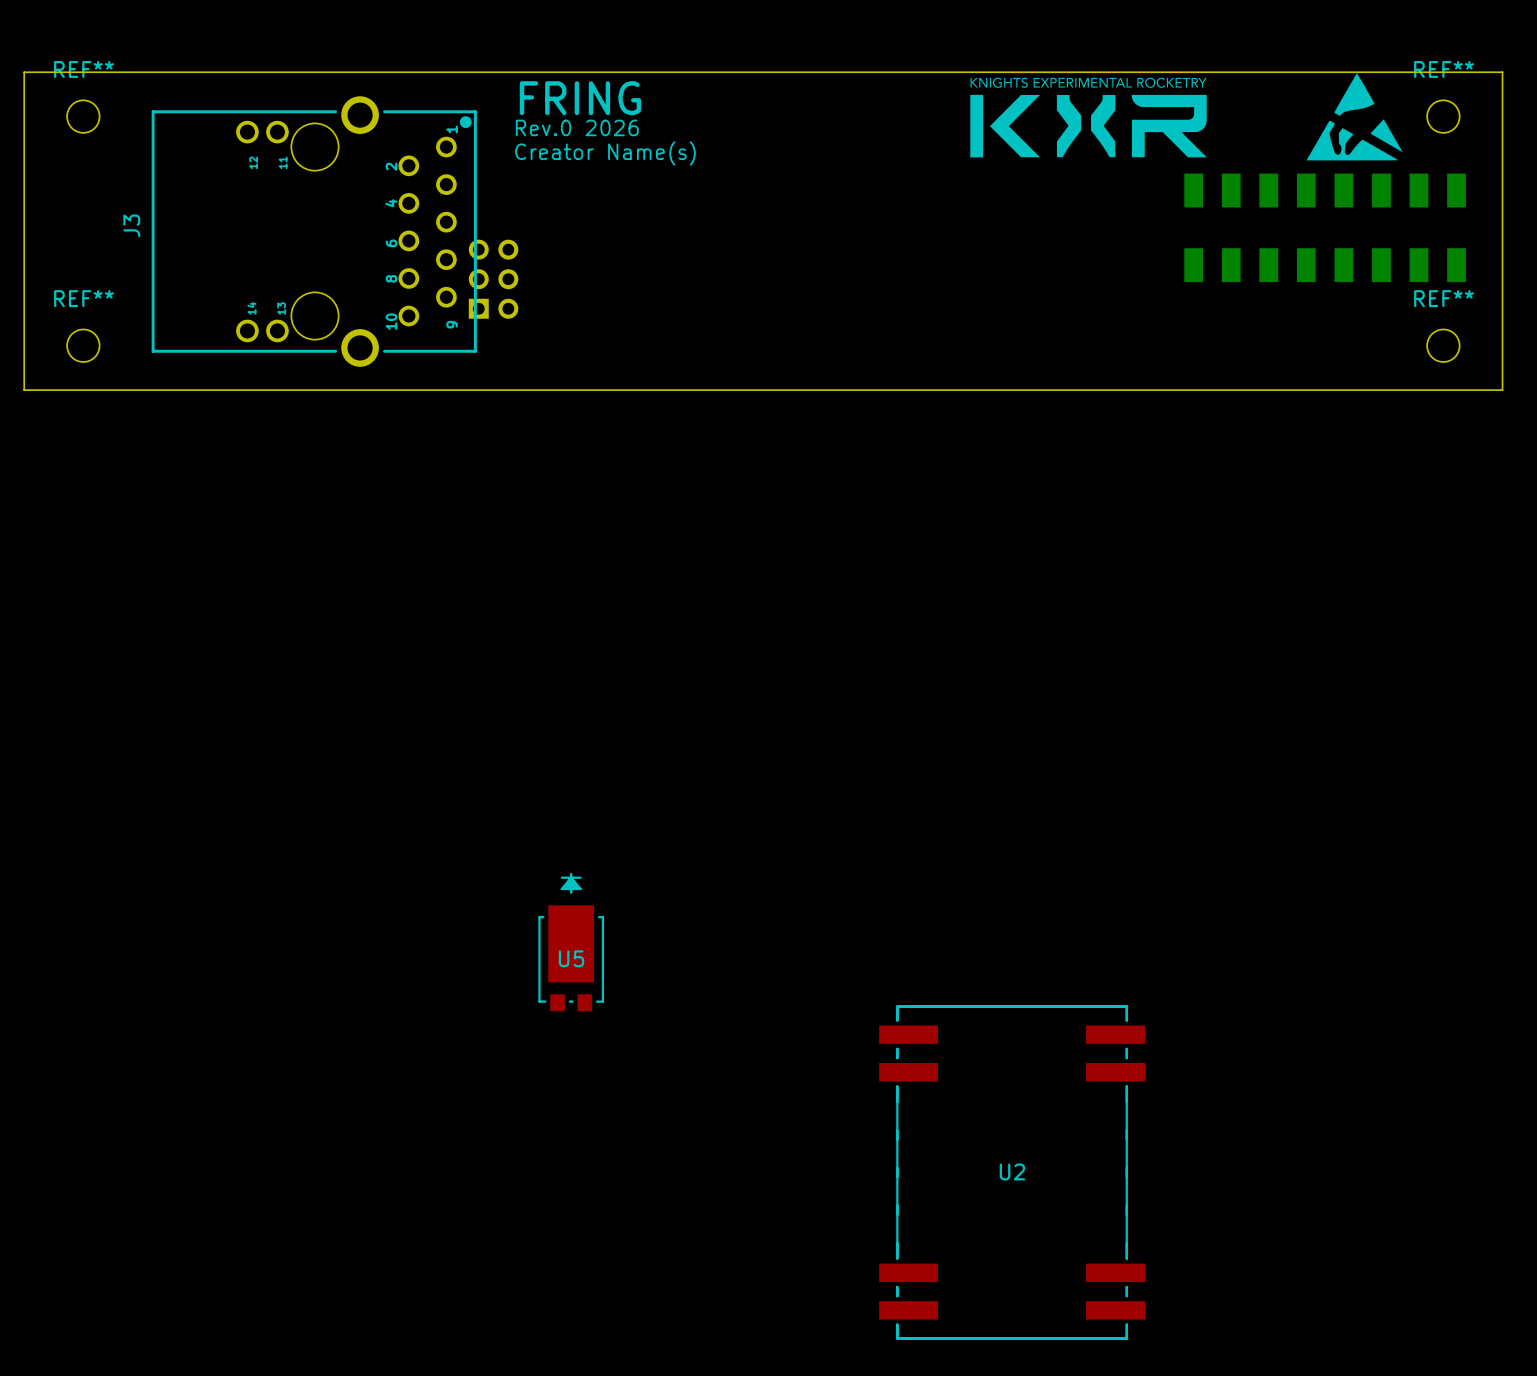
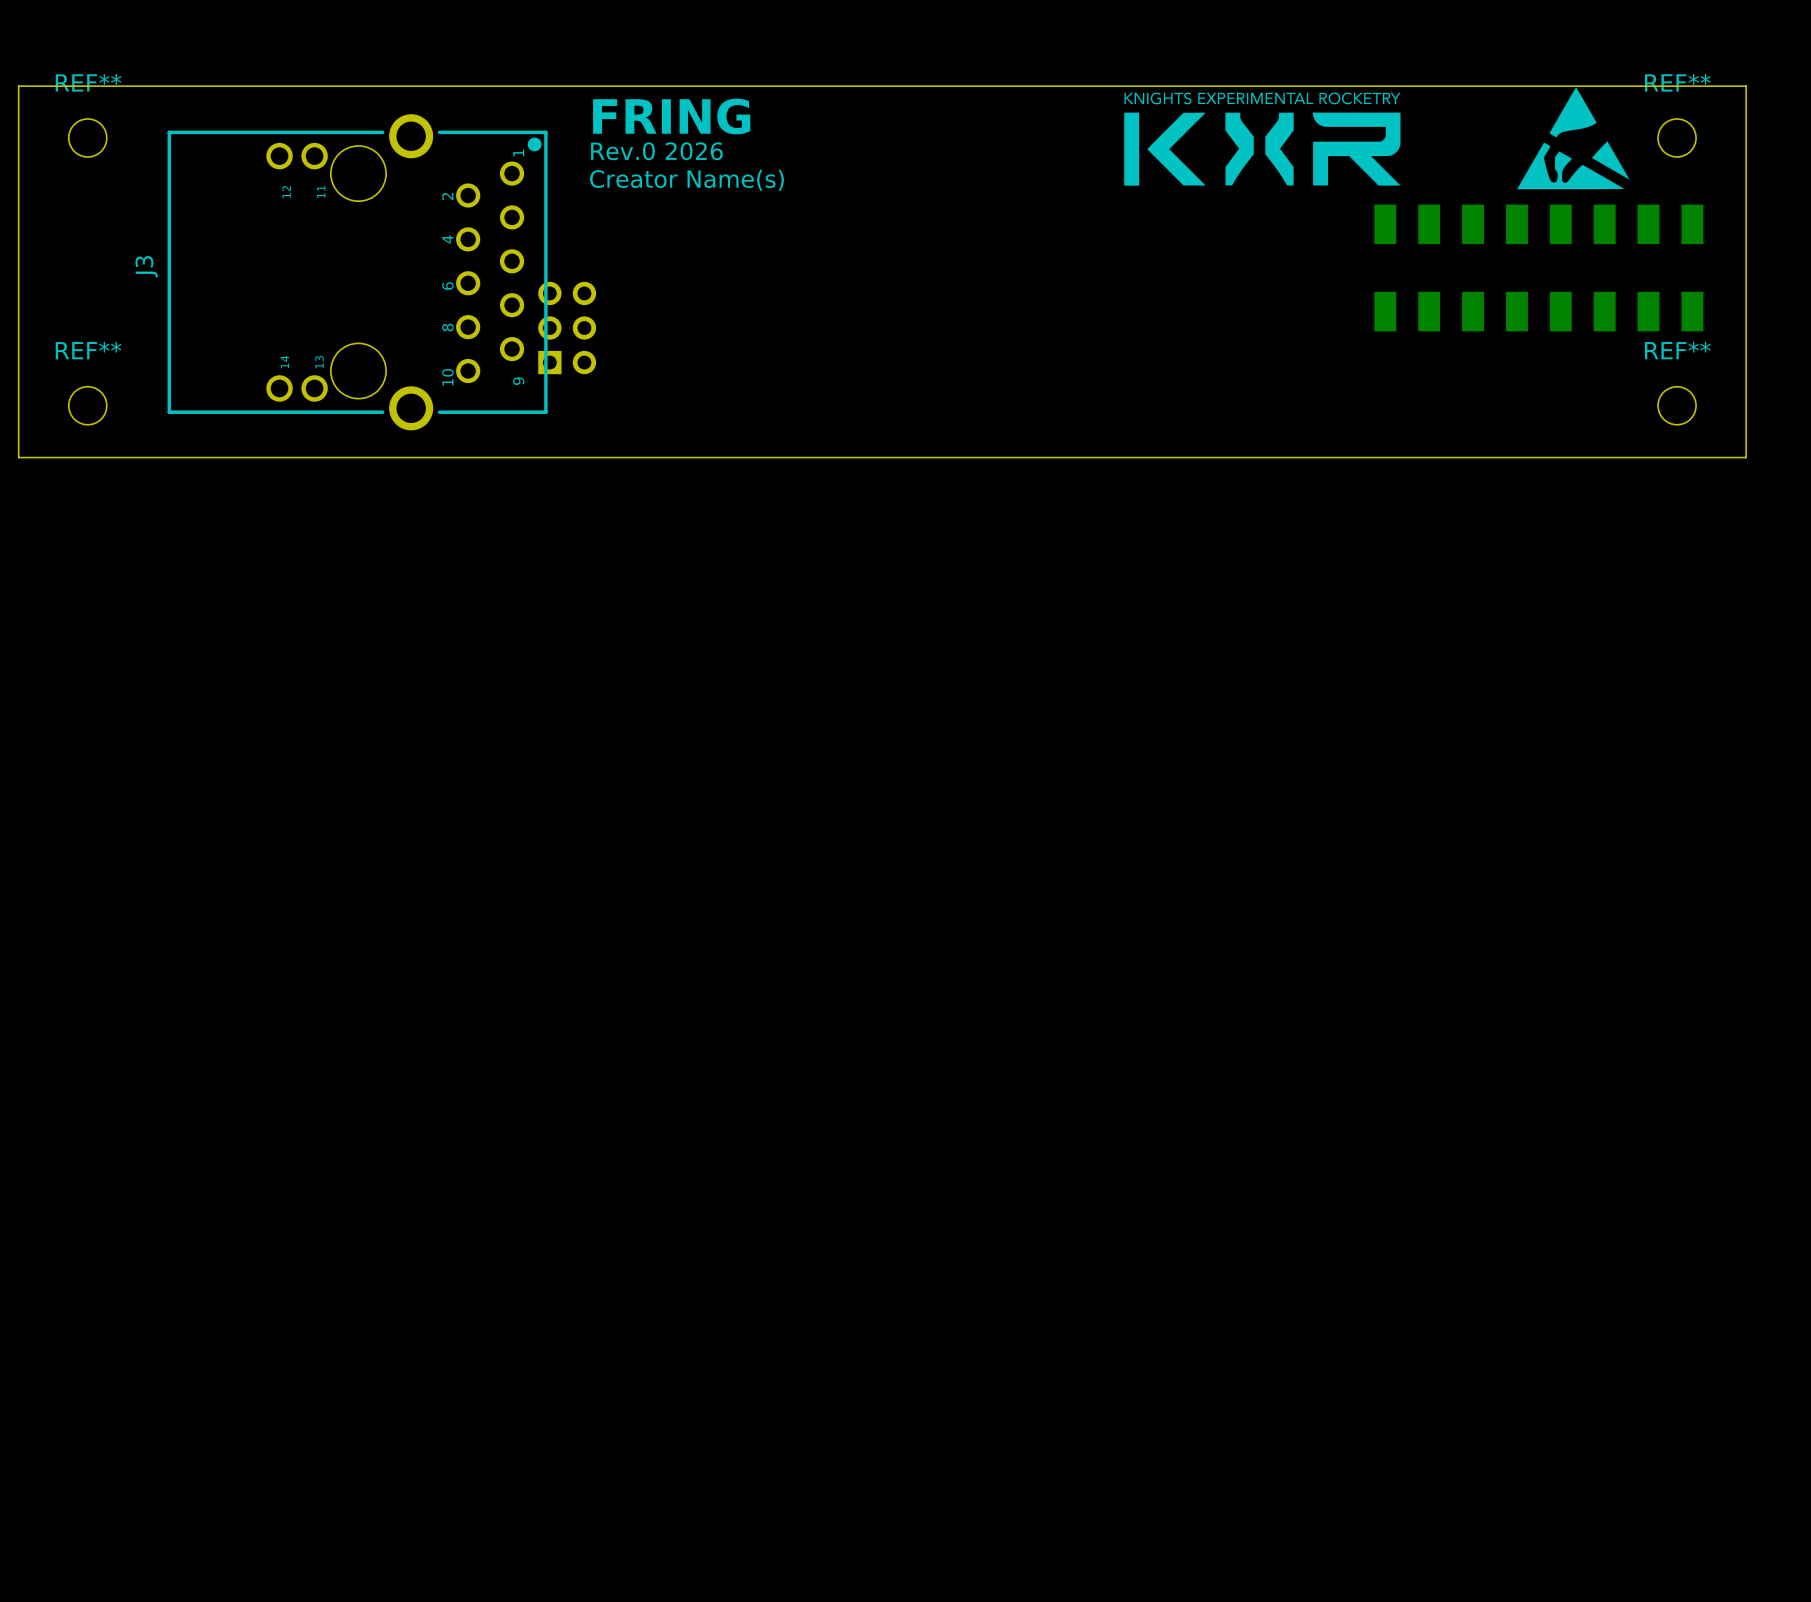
U5: (571, 941) -> none
U2: (1012, 1172) -> none

